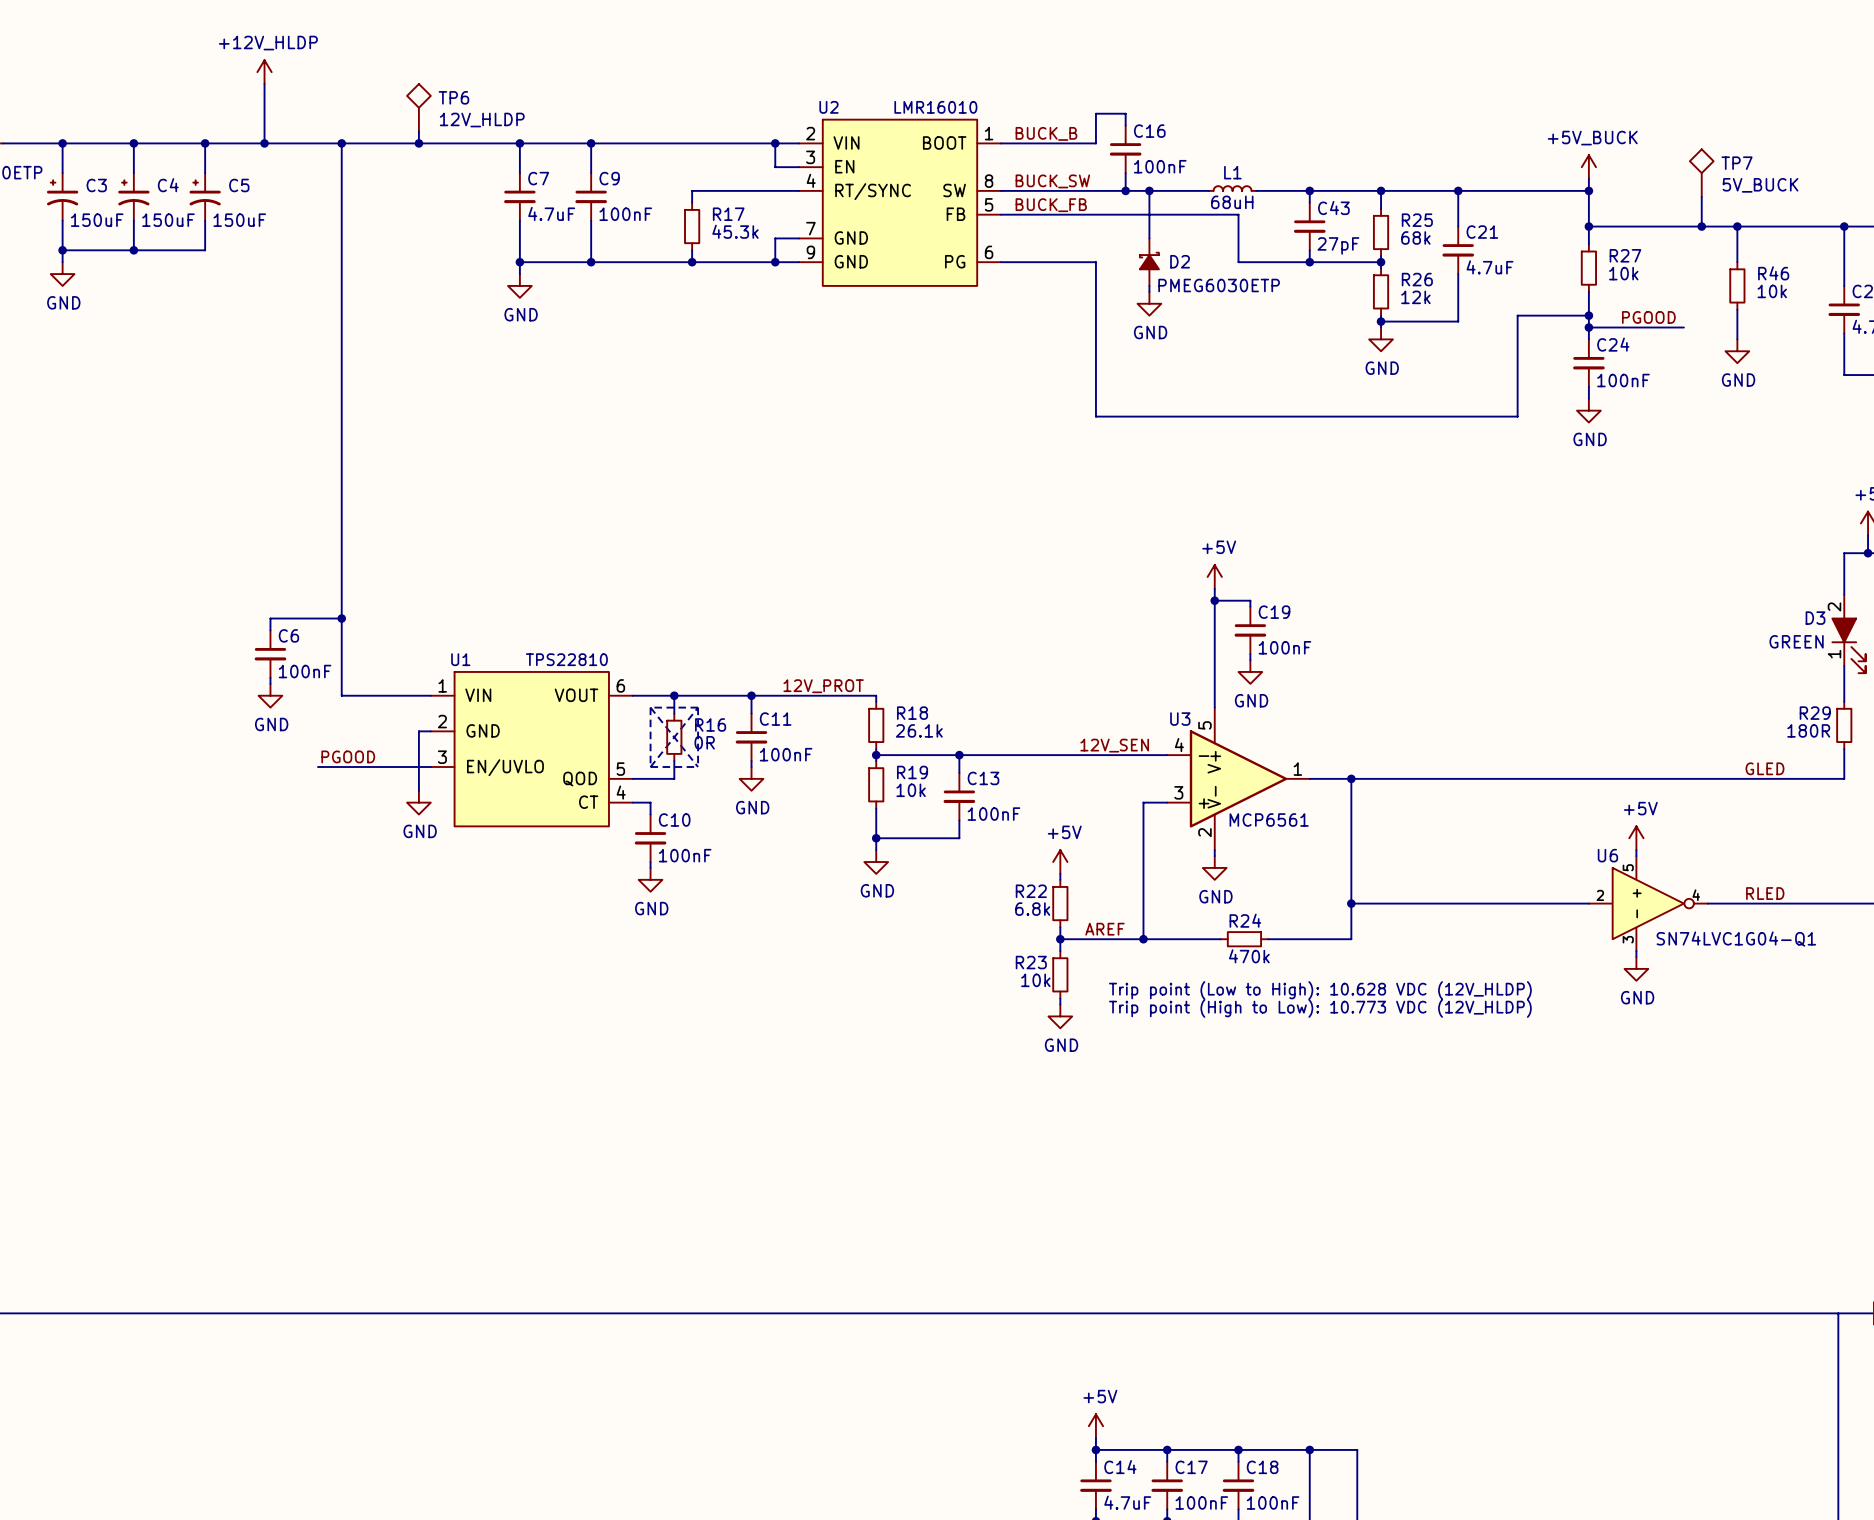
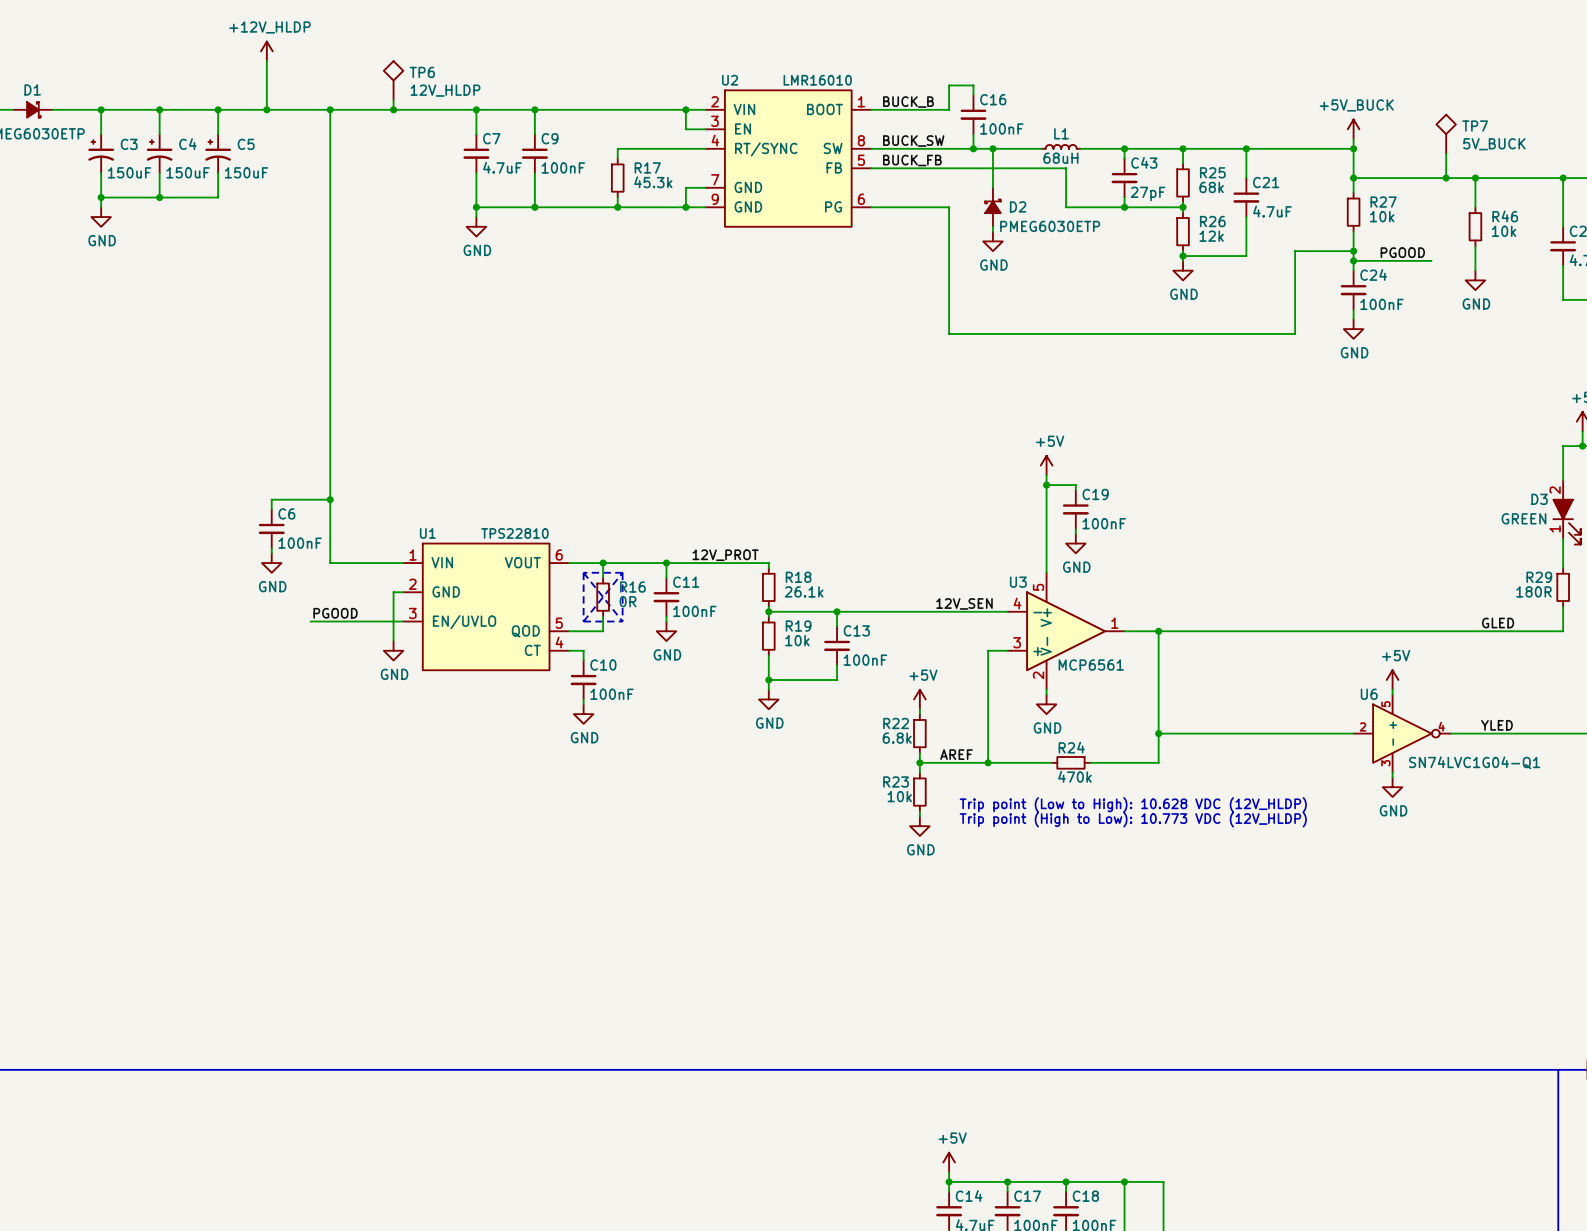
label: RLED (1765, 893) -> YLED (1496, 725)

